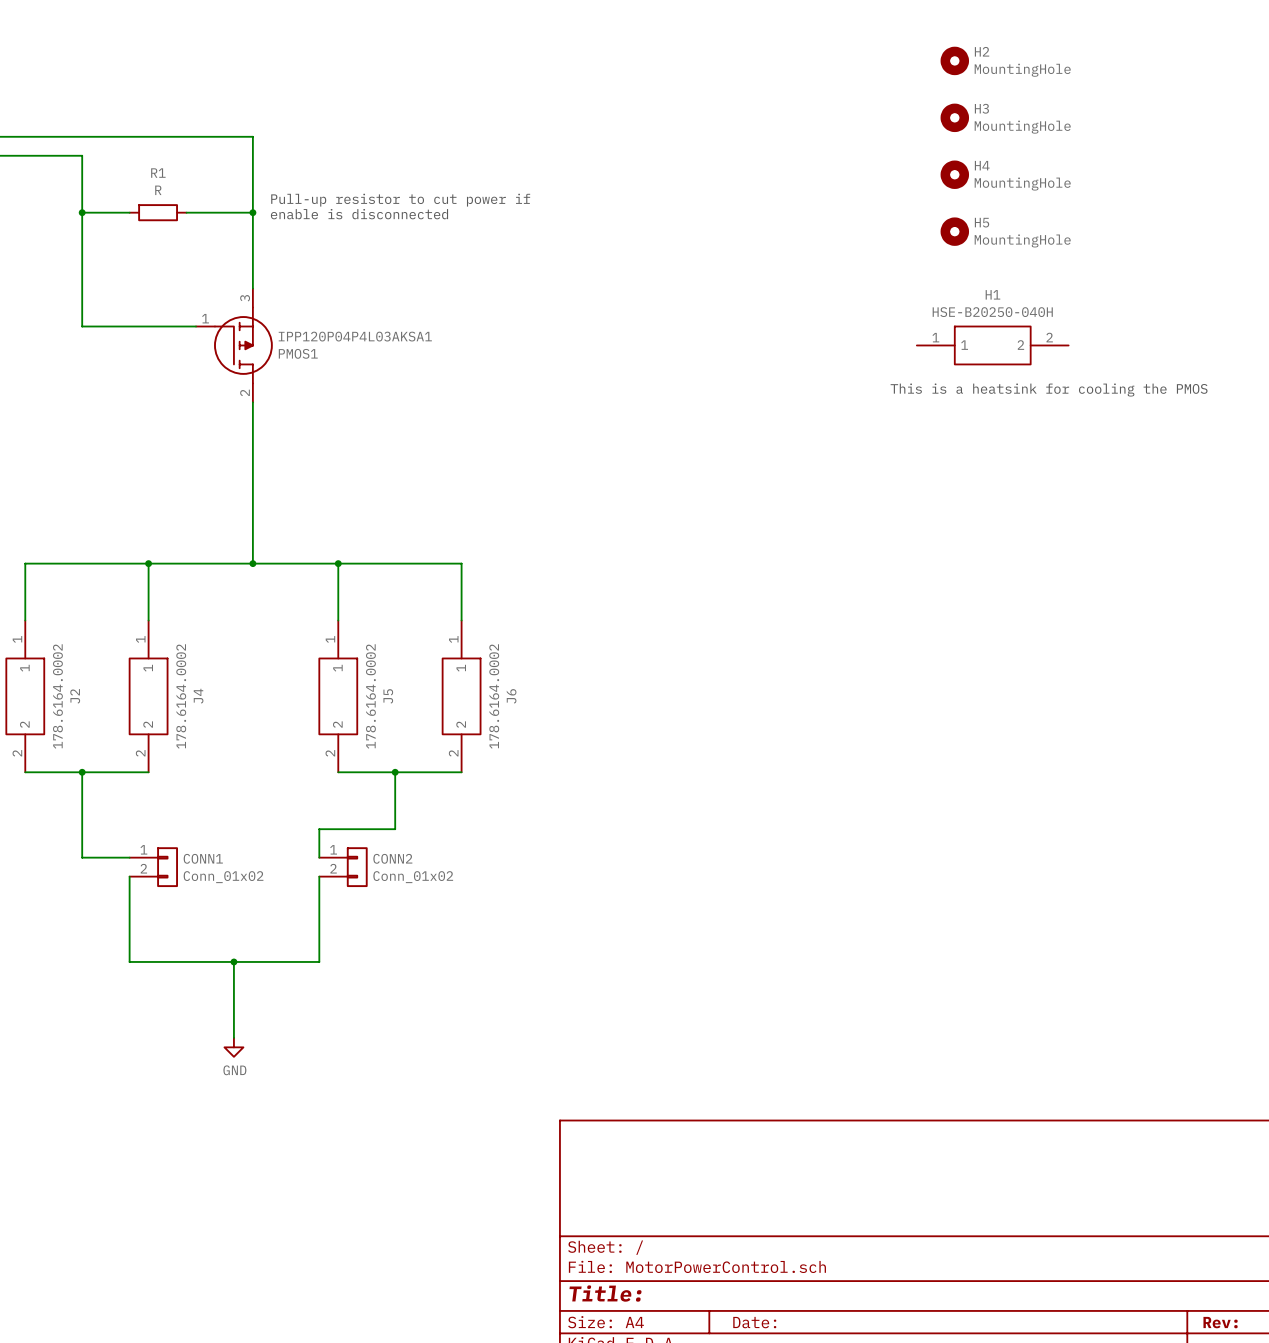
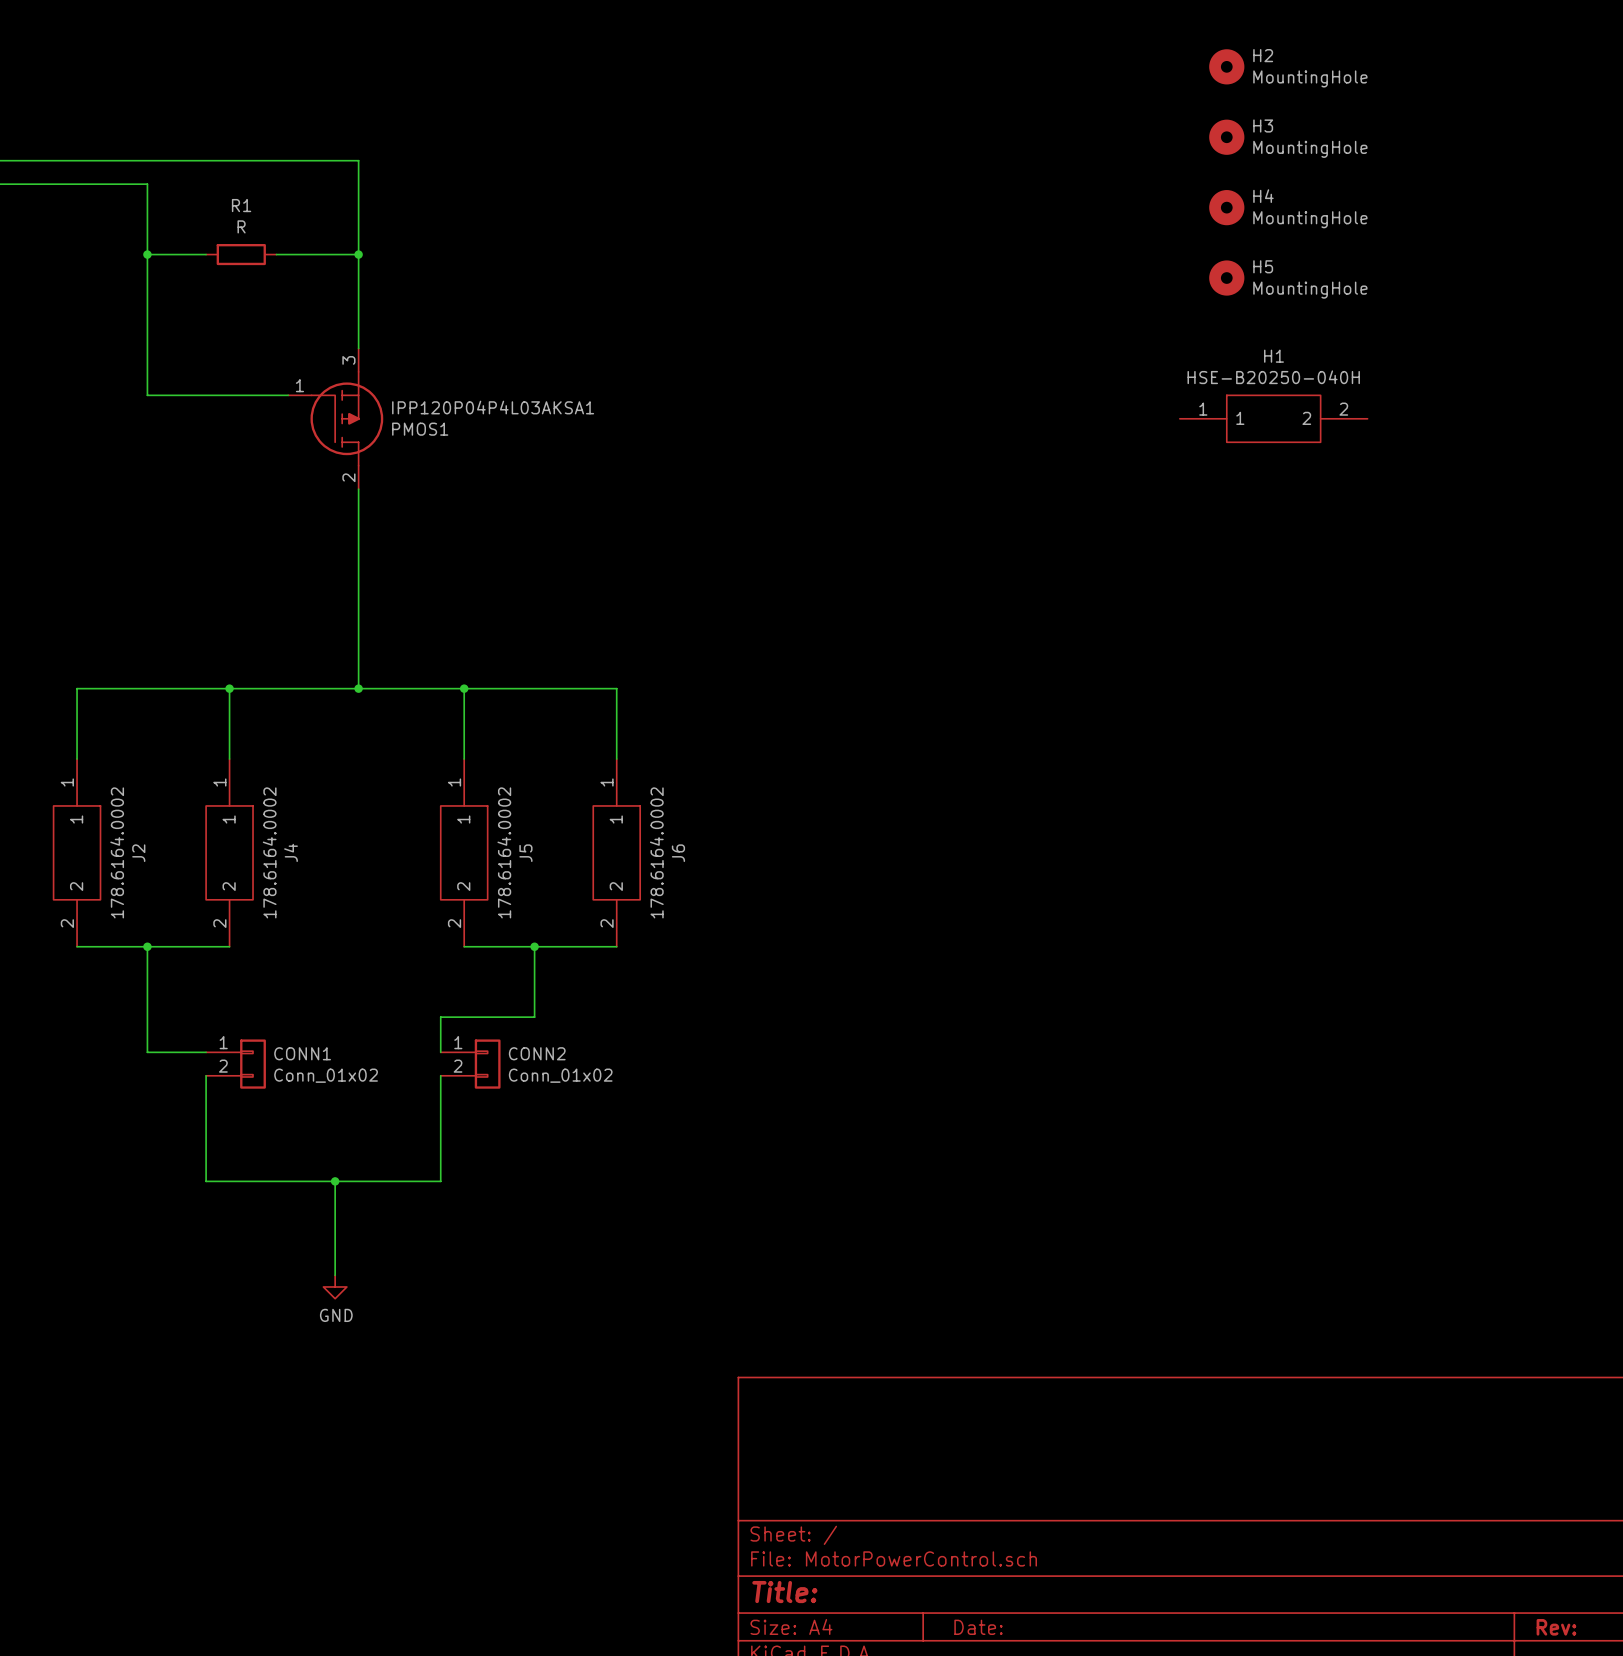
text: Pull-up resistor to cut power if (400, 200) -> none
text: enable is disconnected (359, 214) -> none
text: This is a heatsink for cooling the PMOS (1049, 390) -> none

